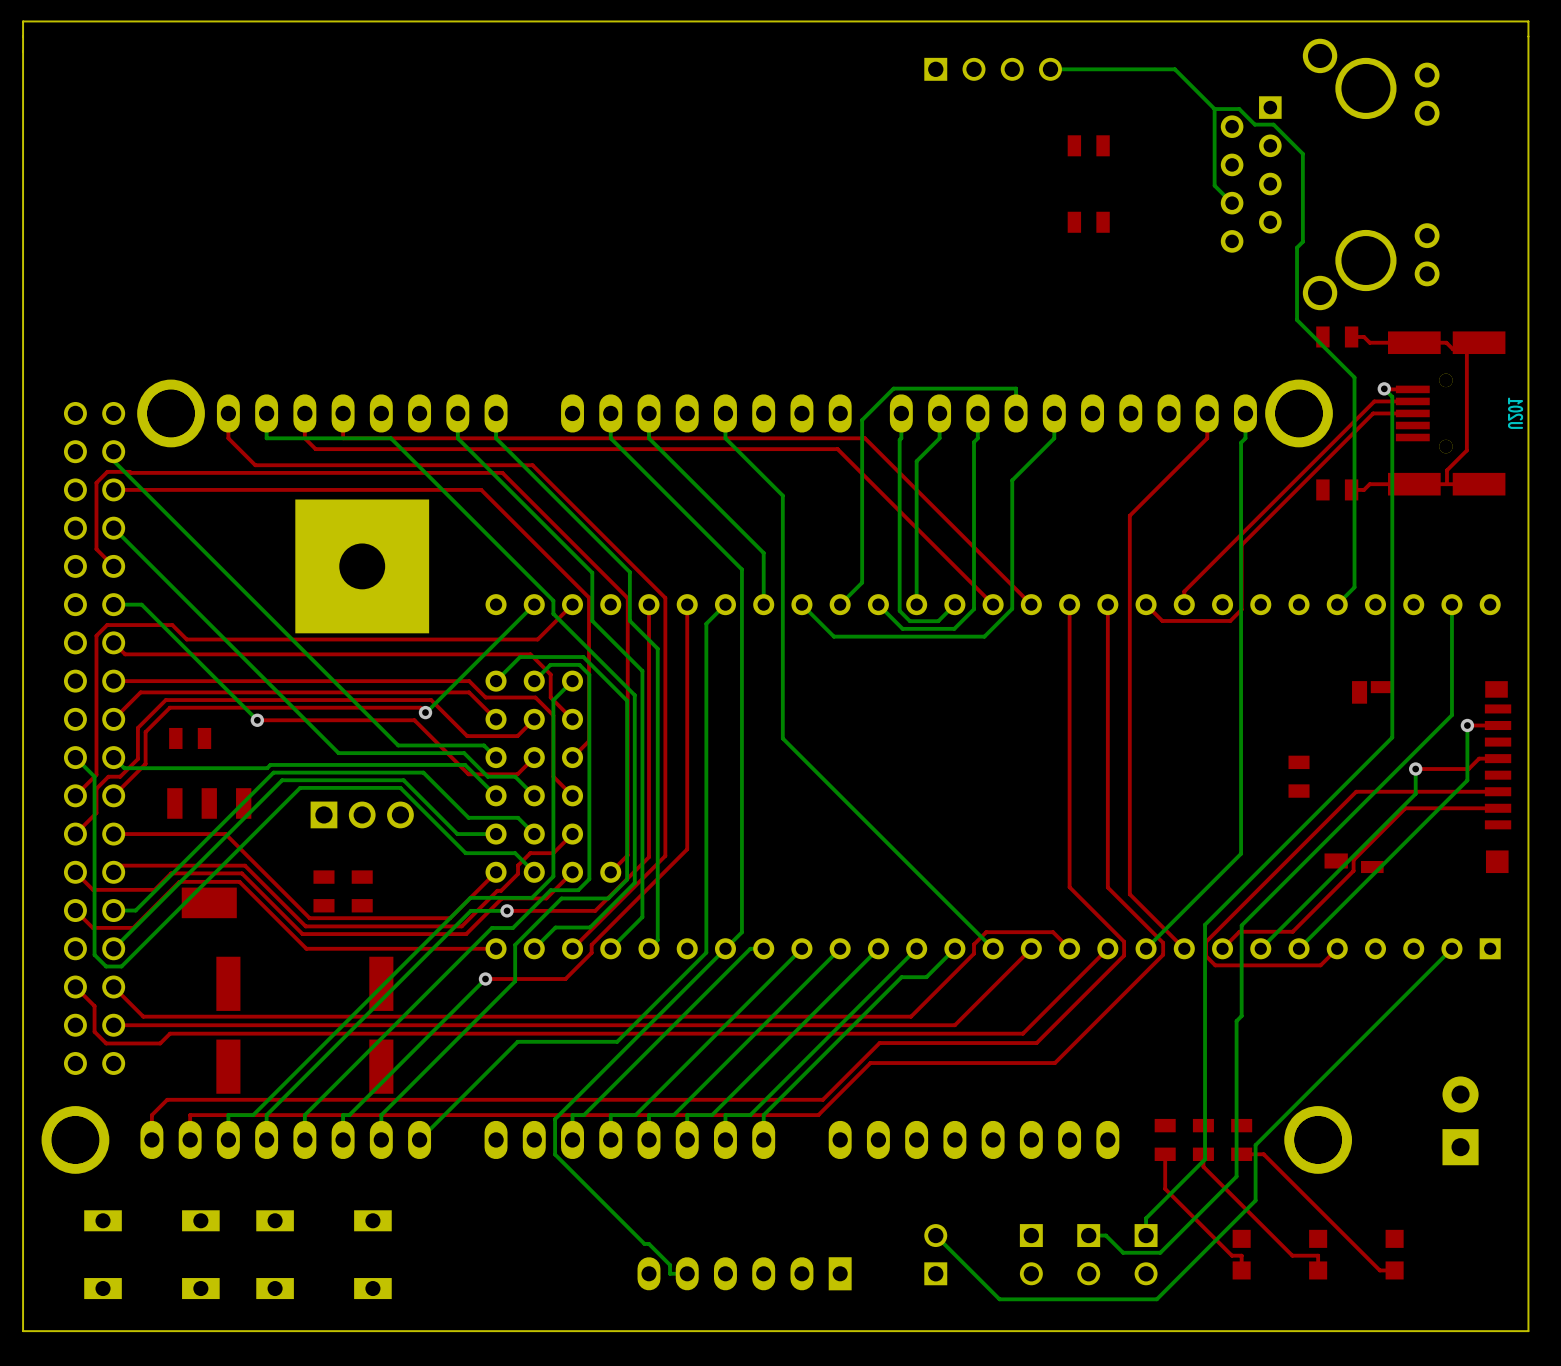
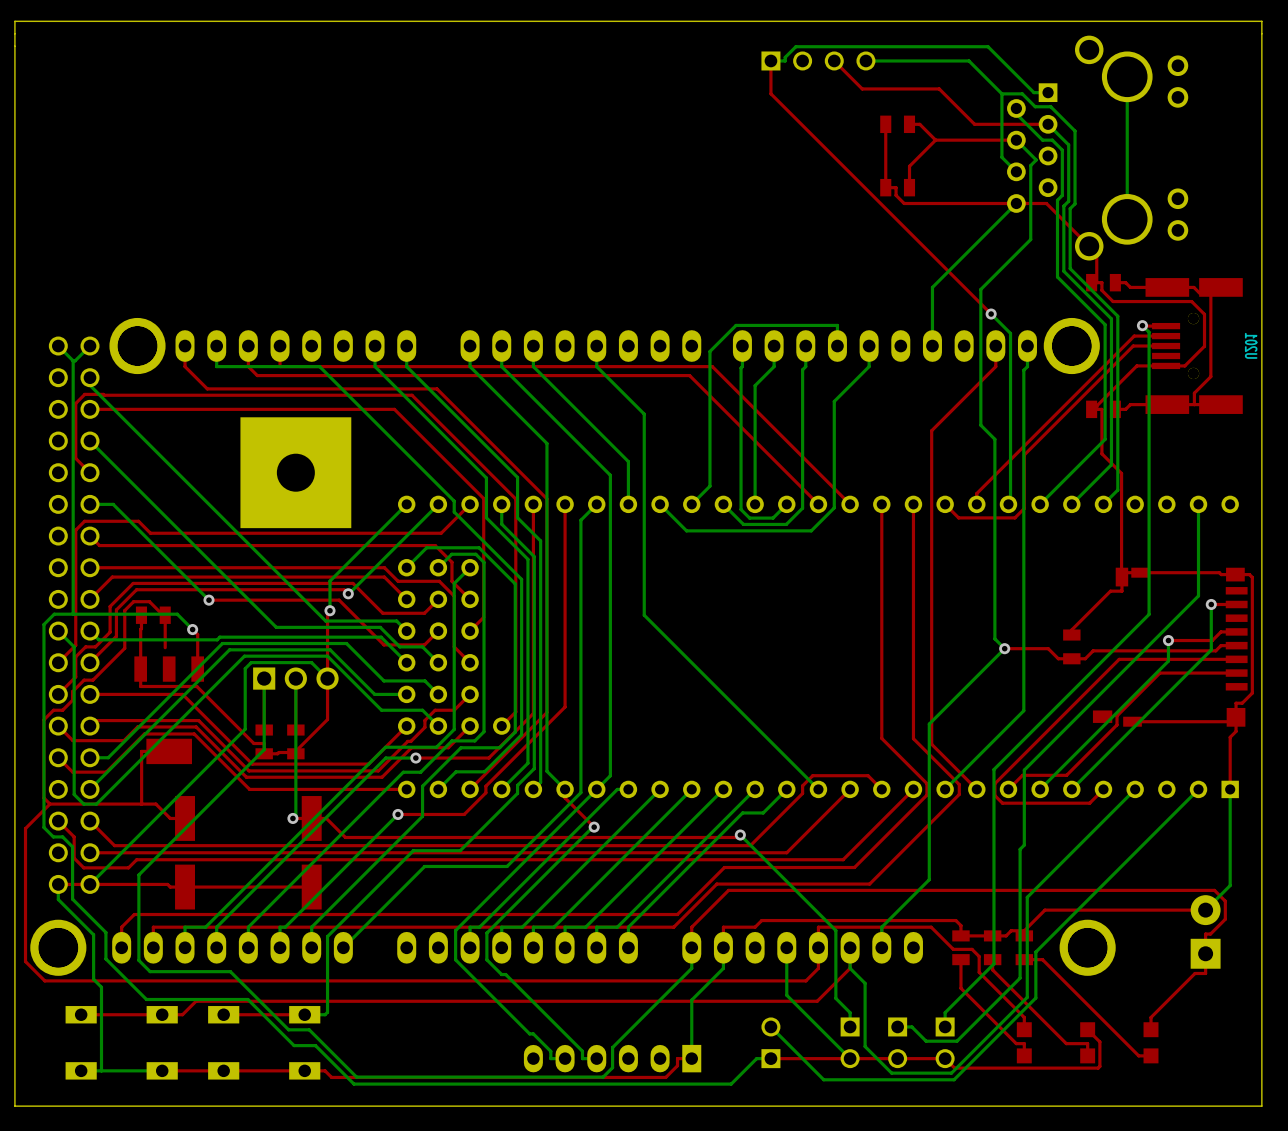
bottom track: none -> (770, 60) (785, 60) (785, 57) (795, 46) (988, 46) (1033, 92) (1048, 92)
top track: none -> (770, 60) (770, 93) (991, 314)
top track: none -> (834, 60) (862, 88) (939, 88) (974, 124) (1048, 124)
bottom track: none -> (1127, 76) (1127, 219)
bottom track: none -> (1016, 108) (1016, 113) (1042, 140) (1052, 140) (1062, 150) (1062, 195) (1057, 200) (1057, 277) (1105, 324) (1105, 439) (1040, 504)
top track: none -> (885, 124) (885, 187) (896, 187) (896, 195) (904, 203) (1046, 203) (1093, 250) (1096, 250) (1096, 282)
top track: none -> (909, 124) (919, 124) (935, 140)
bottom track: none -> (1048, 124) (1068, 144) (1068, 201) (1063, 206) (1063, 271) (1111, 318) (1111, 464) (1071, 504)
top track: none -> (935, 140) (909, 166) (909, 187)
bottom track: none -> (1016, 140) (1036, 160) (1030, 165) (1030, 239) (980, 289) (980, 425) (994, 439) (994, 638) (1004, 648) (929, 724) (929, 879) (881, 927) (881, 947)
top track: none -> (1016, 140) (935, 140)
bottom track: none -> (1016, 203) (932, 287) (932, 346)
top track: none -> (1091, 282) (1101, 282) (1101, 290) (1113, 301) (1191, 301) (1204, 314) (1204, 346) (1184, 365) (1136, 365) (1096, 406) (1096, 409)
bottom track: none -> (991, 314) (1010, 333) (1010, 502) (1008, 504)
via: none -> (991, 314)
bottom track: none -> (58, 346) (73, 360)
bottom track: none -> (90, 346) (73, 360)
bottom track: none -> (470, 346) (470, 366) (546, 443) (546, 771) (565, 789)
bottom track: none -> (73, 360) (73, 614)
top track: none -> (1091, 409) (1101, 409) (1101, 453) (1121, 473) (1121, 570)
bottom track: none -> (406, 504) (329, 581) (329, 610)
bottom track: none -> (501, 504) (501, 524) (534, 556) (534, 768) (517, 785) (517, 793) (460, 850) (413, 850) (327, 936) (327, 1012) (325, 1014) (304, 1014)
top track: none -> (1121, 570) (1121, 591) (1110, 591) (1071, 629) (1071, 635)
top track: none -> (1121, 570) (1126, 572) (1219, 572) (1221, 574) (1249, 574) (1252, 577) (1252, 693) (1242, 703) (1236, 703) (1236, 731) (1230, 737) (1230, 789)
top track: none -> (329, 610) (327, 613) (327, 719) (295, 751) (295, 753)
via: none -> (329, 610)
top track: none -> (141, 615) (140, 686) (196, 686) (253, 743) (264, 743) (264, 753) (295, 752)
top track: none -> (165, 615) (165, 647)
top track: none -> (165, 617) (149, 601) (133, 601) (124, 610) (124, 648) (92, 680) (84, 680) (72, 691) (72, 700) (62, 710) (53, 710) (43, 719) (43, 797) (49, 804)
bottom track: none -> (192, 629) (177, 614) (54, 614) (43, 624) (43, 827) (53, 836) (62, 836) (72, 846) (72, 899) (105, 932) (105, 958) (146, 999) (247, 999) (294, 1045) (315, 1045) (354, 1084) (731, 1084) (756, 1058) (770, 1058)
top track: none -> (192, 629) (197, 634) (197, 669)
via: none -> (192, 629)
top track: none -> (1236, 645) (1221, 645) (1215, 650) (1093, 650) (1085, 658) (1058, 658) (1048, 648) (1004, 648)
via: none -> (1004, 648)
bottom track: none -> (264, 678) (264, 749) (138, 875) (138, 960) (150, 971) (230, 971) (288, 1029) (309, 1029) (356, 1077) (603, 1077) (612, 1067) (612, 1047) (691, 968) (691, 947)
bottom track: none -> (295, 678) (295, 815) (292, 818)
bottom track: none -> (327, 678) (311, 662) (251, 662) (245, 668) (245, 729) (90, 884)
top track: none -> (1236, 721) (1132, 721)
top track: none -> (169, 751) (141, 751) (141, 804)
top track: none -> (565, 789) (565, 798) (594, 827)
bottom track: none -> (1135, 789) (1027, 897) (1027, 997) (951, 1073) (891, 1073) (865, 1046) (865, 983) (850, 968) (850, 947)
bottom track: none -> (1230, 789) (1230, 885) (1205, 910)
top track: none -> (49, 804) (25, 828) (25, 961) (44, 980) (805, 980) (818, 968) (818, 927) (931, 927) (953, 949) (972, 949) (979, 956) (979, 972) (1024, 1017) (1024, 1029)
top track: none -> (49, 804) (155, 804) (170, 818) (185, 818)
top track: none -> (292, 818) (326, 818) (345, 837) (737, 837) (740, 835)
via: none -> (292, 818)
bottom track: none -> (594, 827) (486, 933) (486, 959) (501, 974) (505, 974) (582, 1051) (582, 1058) (596, 1058)
via: none -> (594, 827)
bottom track: none -> (740, 835) (835, 930) (835, 998) (850, 1012) (850, 1026)
via: none -> (740, 835)
bottom track: none -> (58, 884) (58, 899) (93, 934) (93, 979) (101, 987) (101, 1070)
top track: none -> (58, 884) (311, 887)
top track: none -> (1205, 910) (1044, 910) (1024, 930)
top track: none -> (1024, 930) (1011, 930) (1006, 935) (960, 935) (960, 925) (955, 920) (761, 920) (755, 927) (723, 927) (723, 947)
top track: none -> (691, 947) (691, 927) (728, 890) (1214, 890) (1225, 901) (1225, 919) (1210, 934) (1205, 934) (1205, 973) (1195, 973) (1151, 1017) (1151, 1029)
bottom track: none -> (723, 947) (723, 968) (691, 1000) (691, 1058)
bottom track: none -> (786, 947) (786, 995) (850, 1058)
top track: none -> (850, 947) (850, 968) (817, 1001) (196, 1001) (182, 1014) (81, 1014)
top track: none -> (304, 1014) (223, 1014)
top track: none -> (1087, 1029) (1099, 1041) (1099, 1066) (1098, 1068) (954, 1068) (945, 1058) (770, 1058)
top track: none -> (691, 1058) (677, 1058) (677, 1065) (665, 1077) (331, 1077) (325, 1070) (162, 1070)
bottom track: none -> (162, 1070) (81, 1070)

